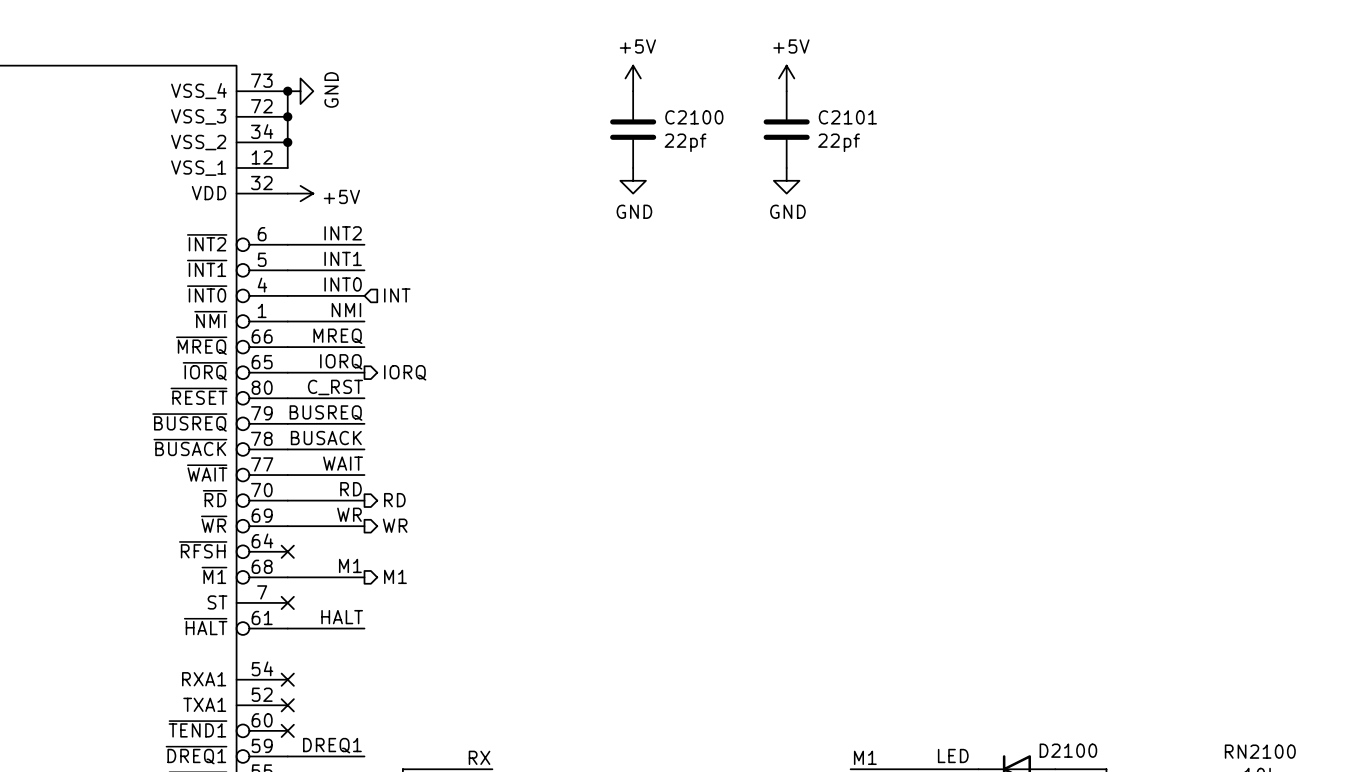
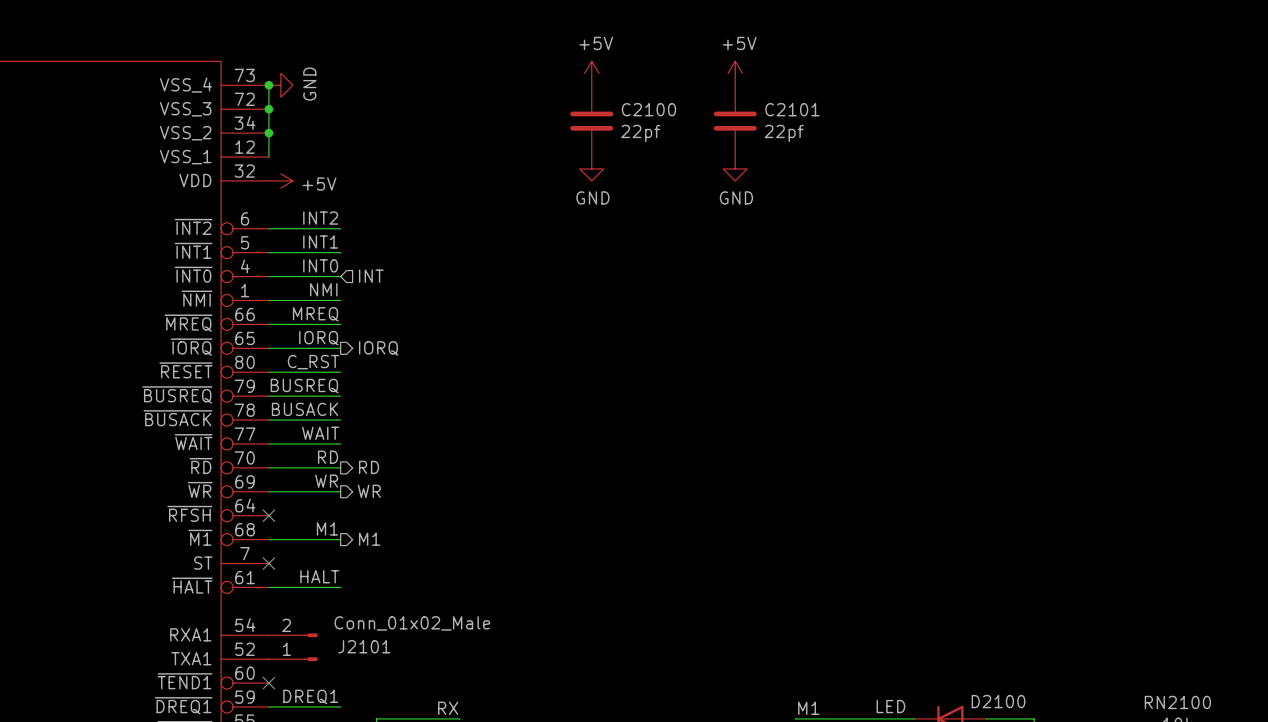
no-connect mark: (287, 679) -> none
J2101: none -> Conn_01x02_Male (293, 647)
no-connect mark: (287, 705) -> none

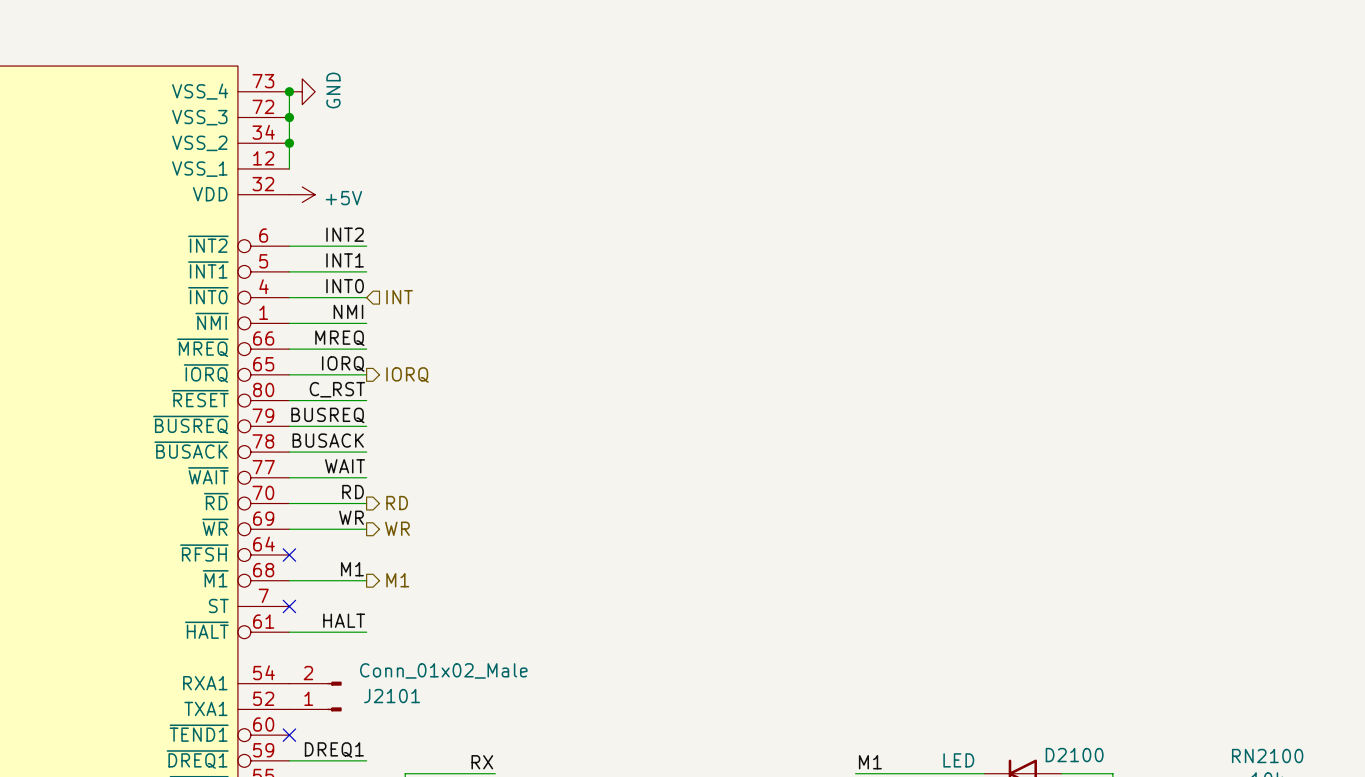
power symbol: +5V (591, 73) -> none
power symbol: +5V (735, 73) -> none
C2100: 22pf (591, 121) -> none
C2101: 22pf (735, 121) -> none
power symbol: GND (591, 168) -> none
power symbol: GND (735, 168) -> none

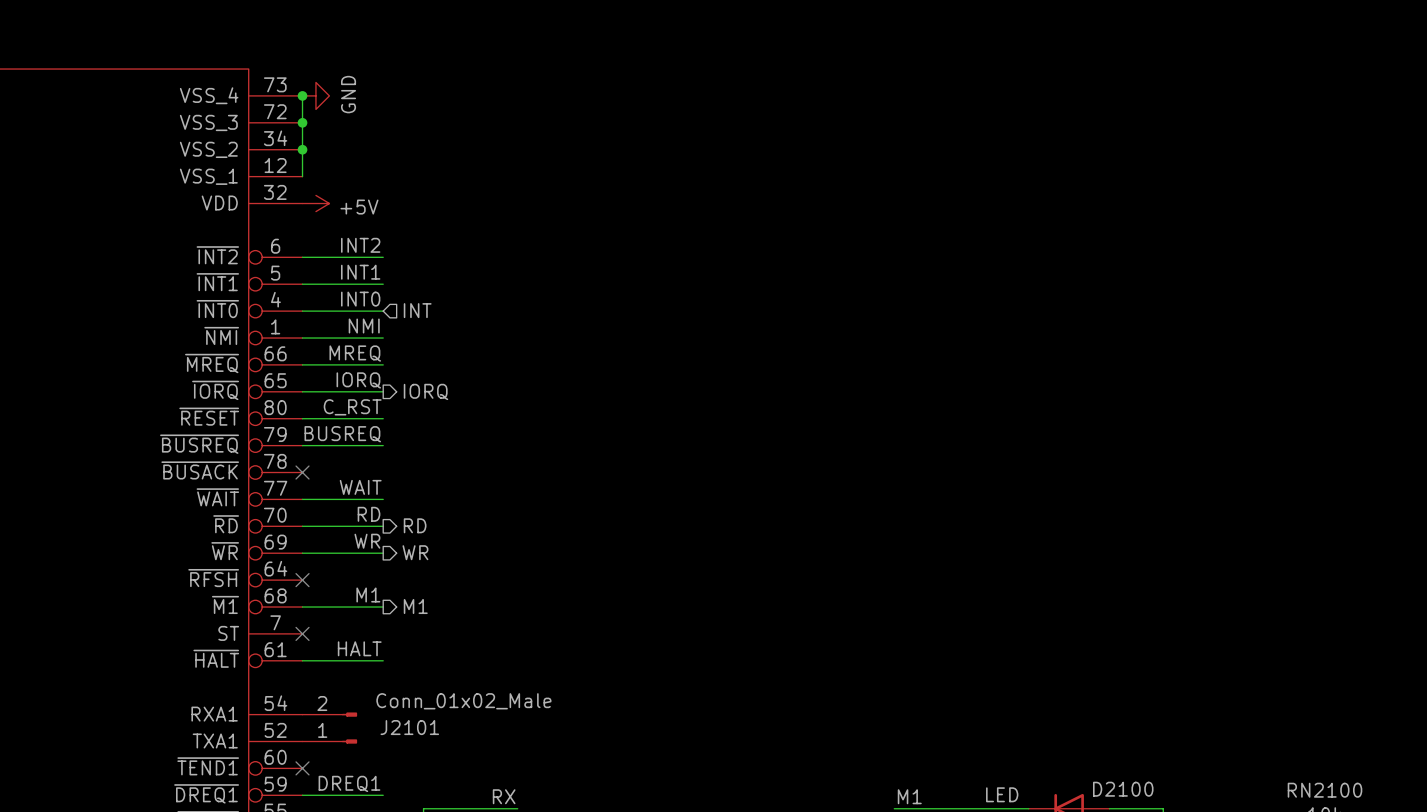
label: BUSACK (328, 440) -> none
wire: (289, 452) (366, 452) -> none
no-connect mark: none -> (302, 472)

